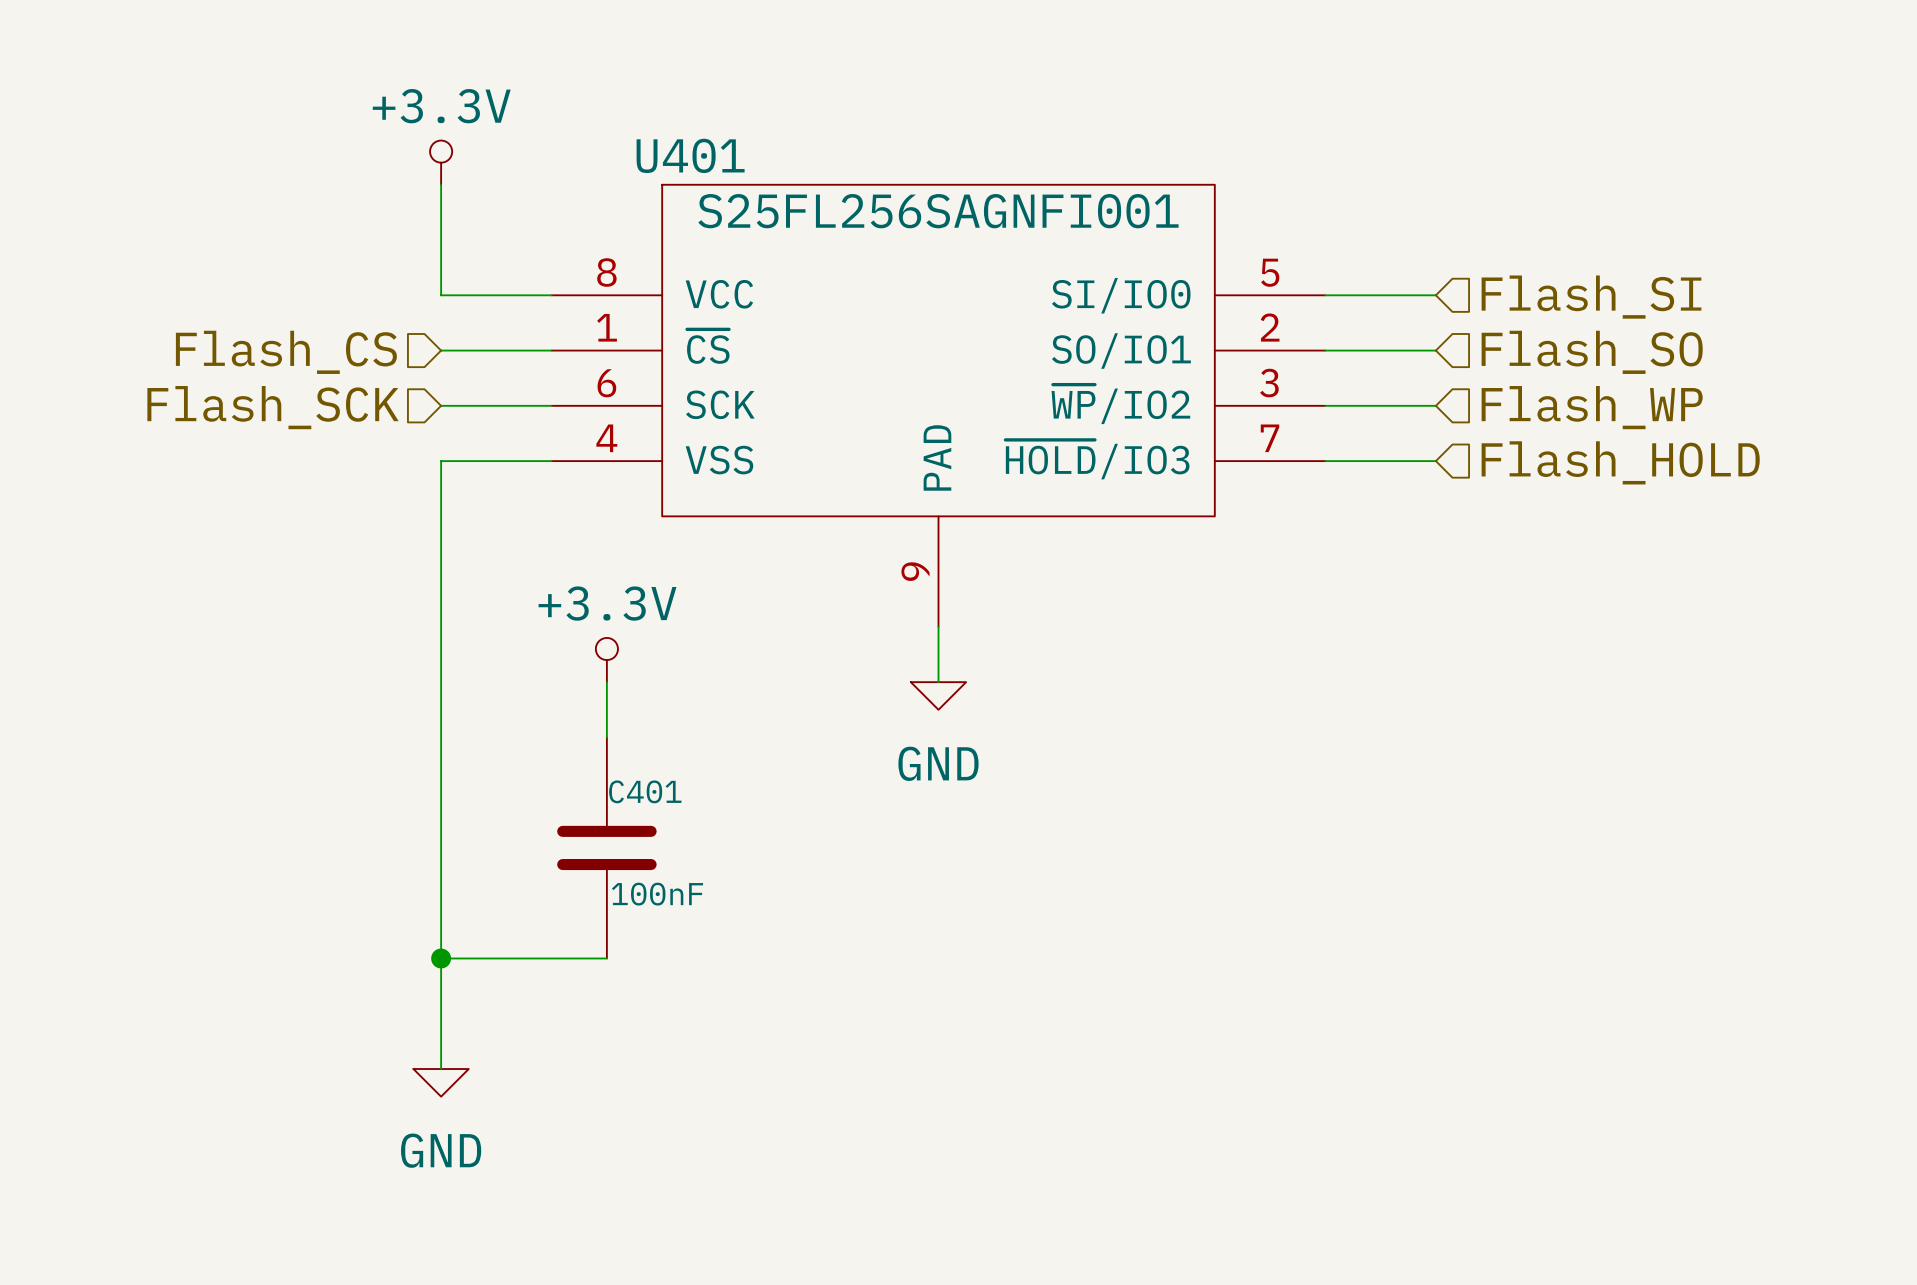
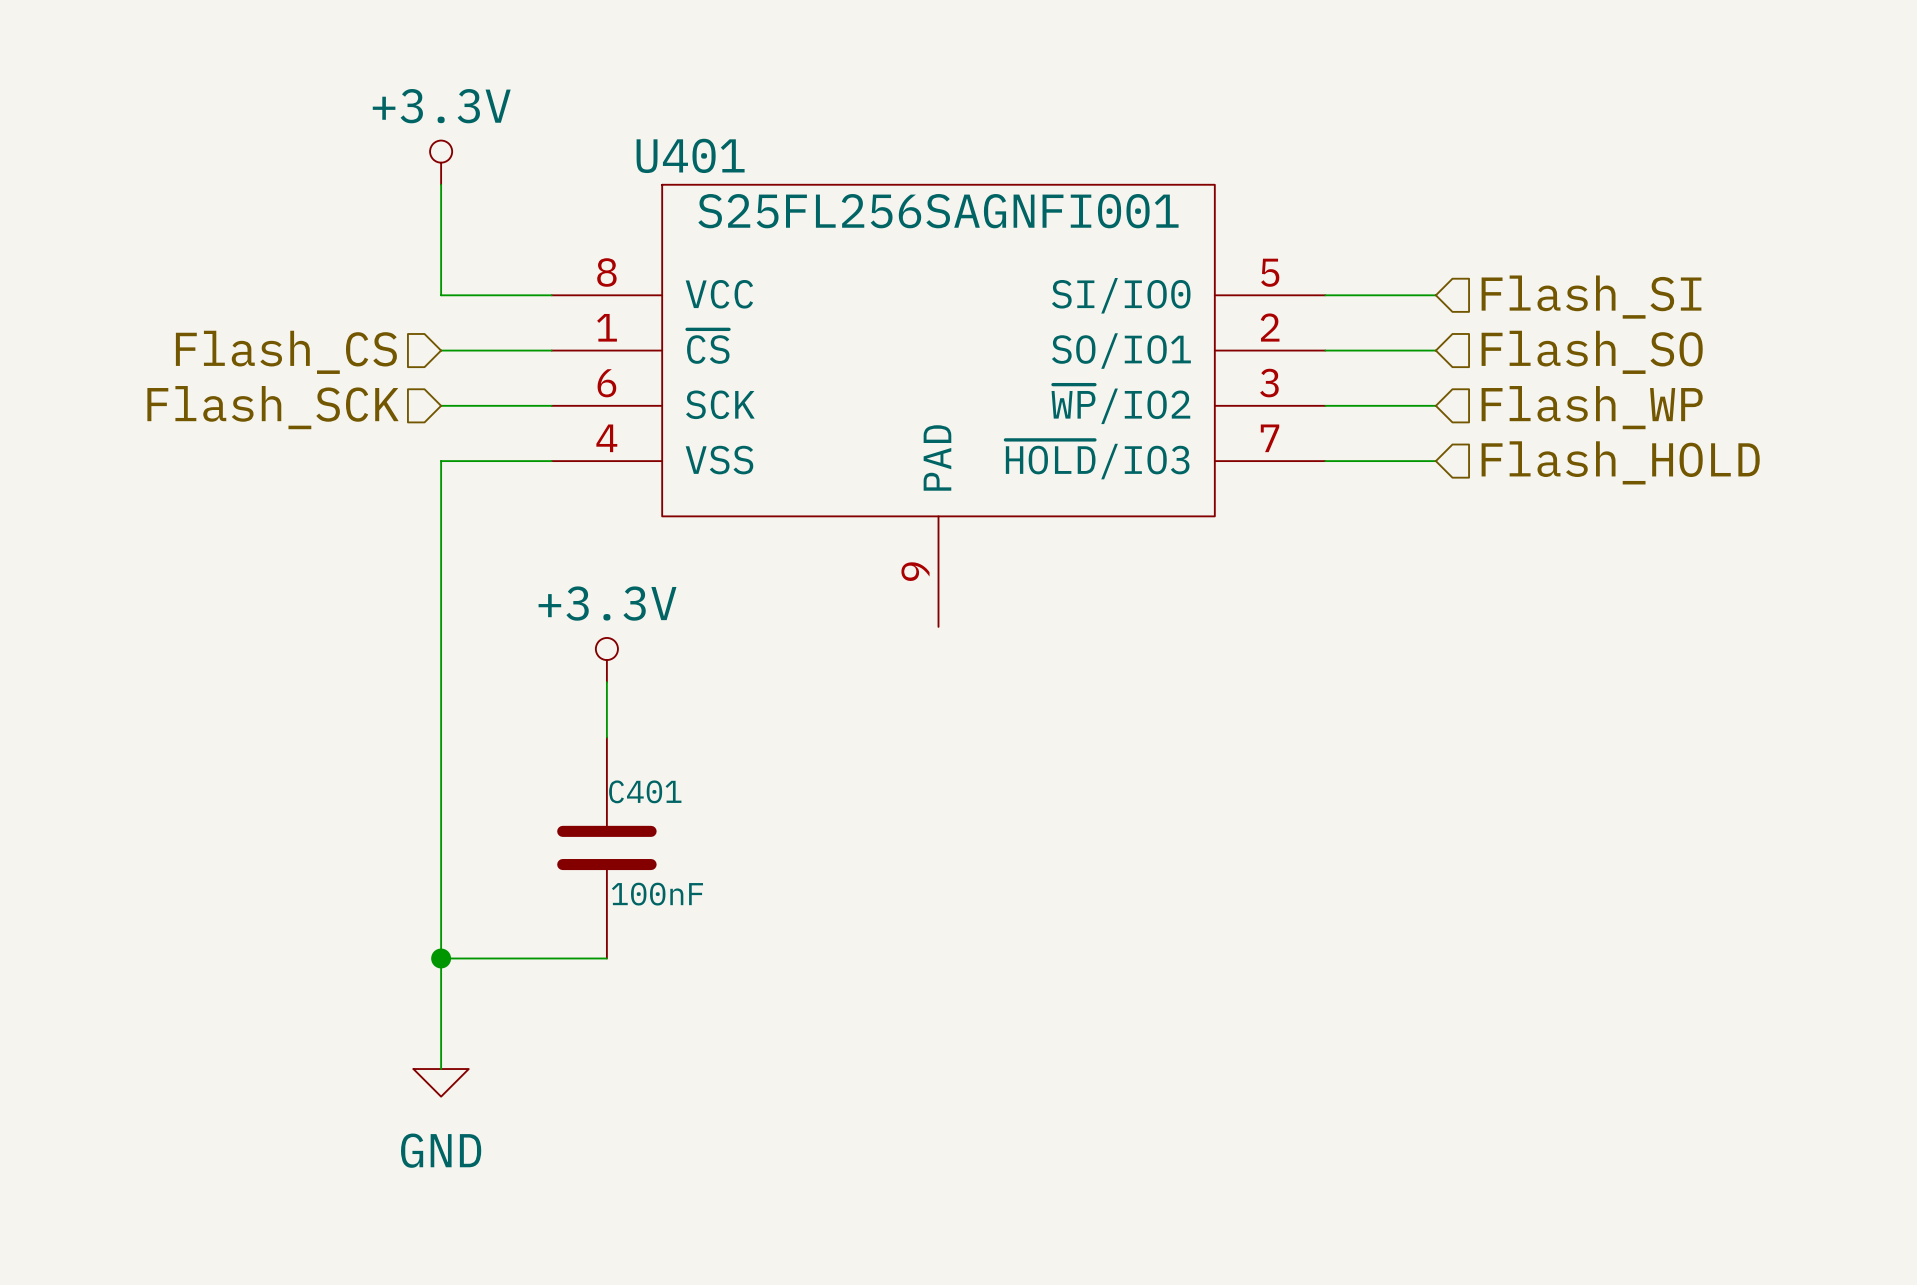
wire: (938, 626) (938, 682) -> none
power symbol: GND (938, 695) -> none

